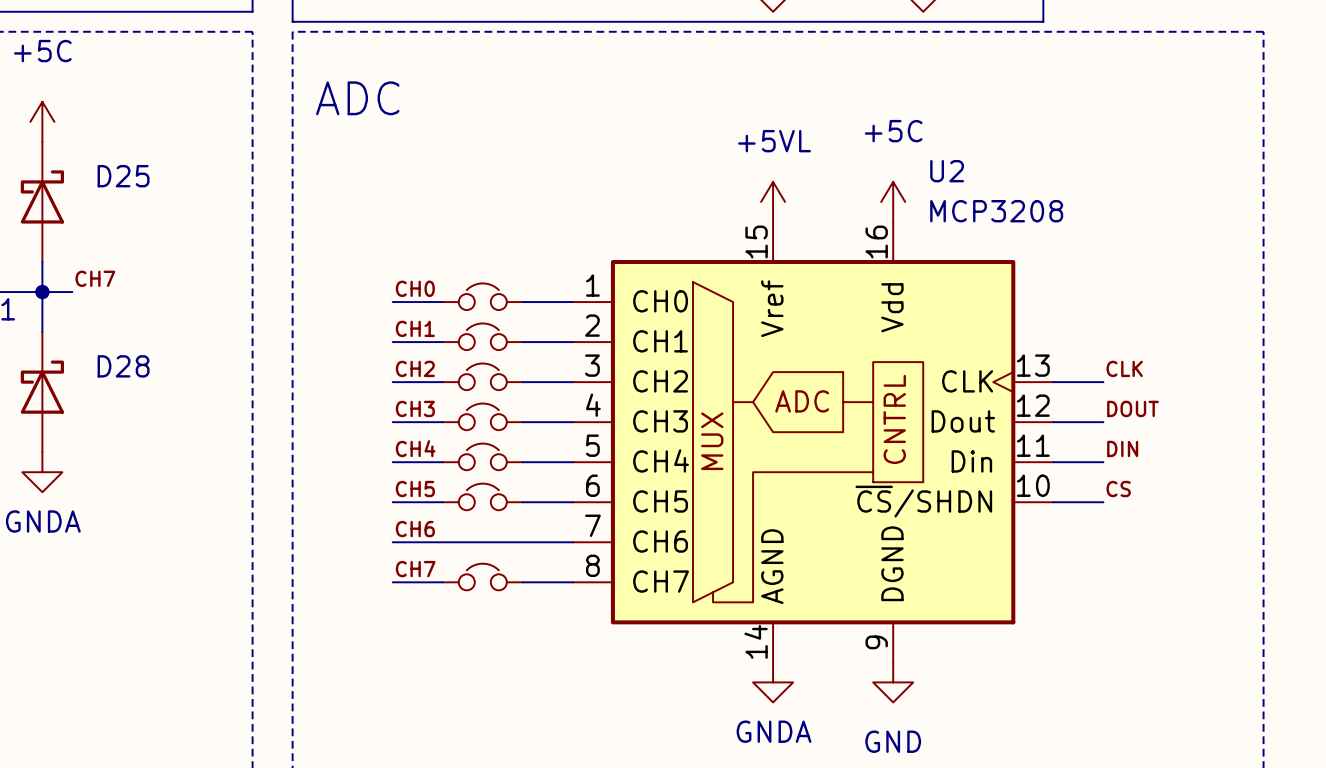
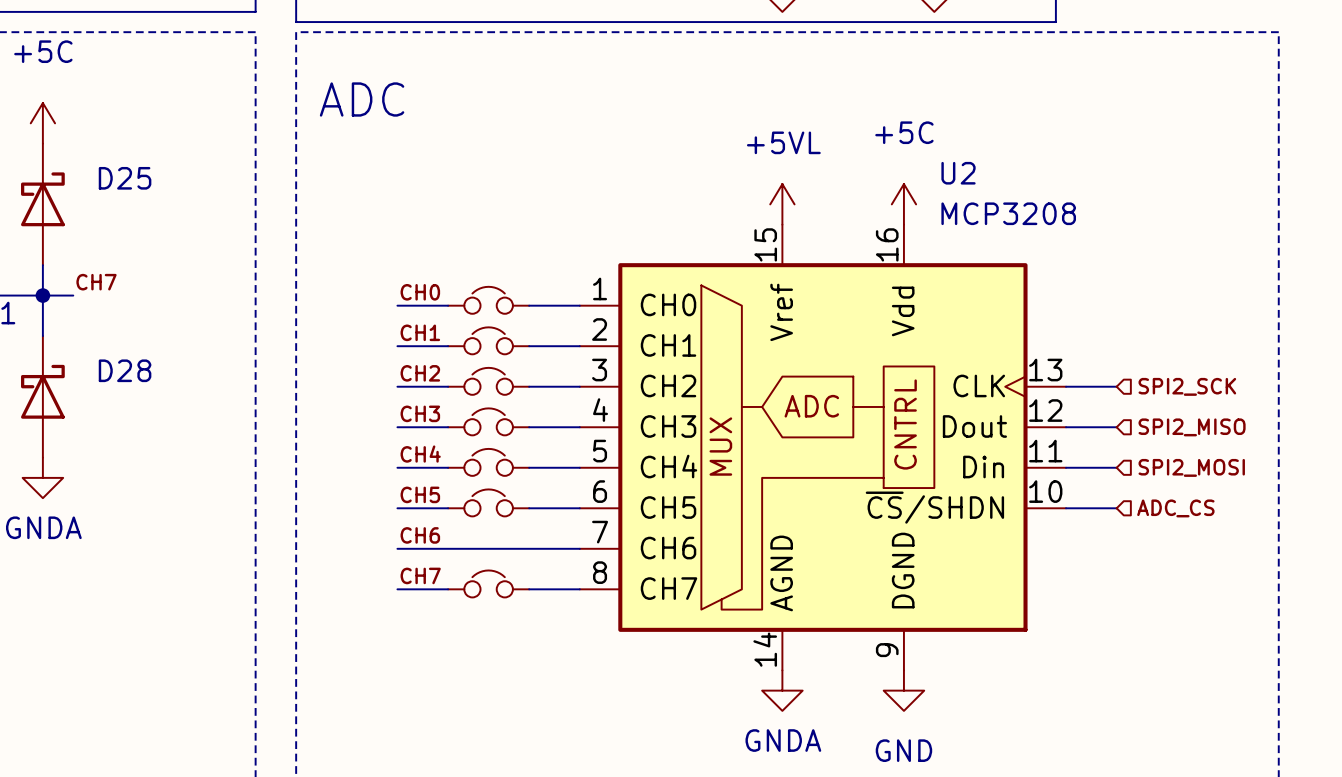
label: CLK (1124, 368) -> none
hierarchical label: none -> SPI2_SCK (1187, 386)
label: DOUT (1133, 408) -> none
hierarchical label: none -> SPI2_MISO (1192, 427)
label: DIN (1122, 448) -> none
hierarchical label: none -> SPI2_MOSI (1191, 467)
label: CS (1118, 489) -> none
hierarchical label: none -> ADC_CS (1175, 508)

